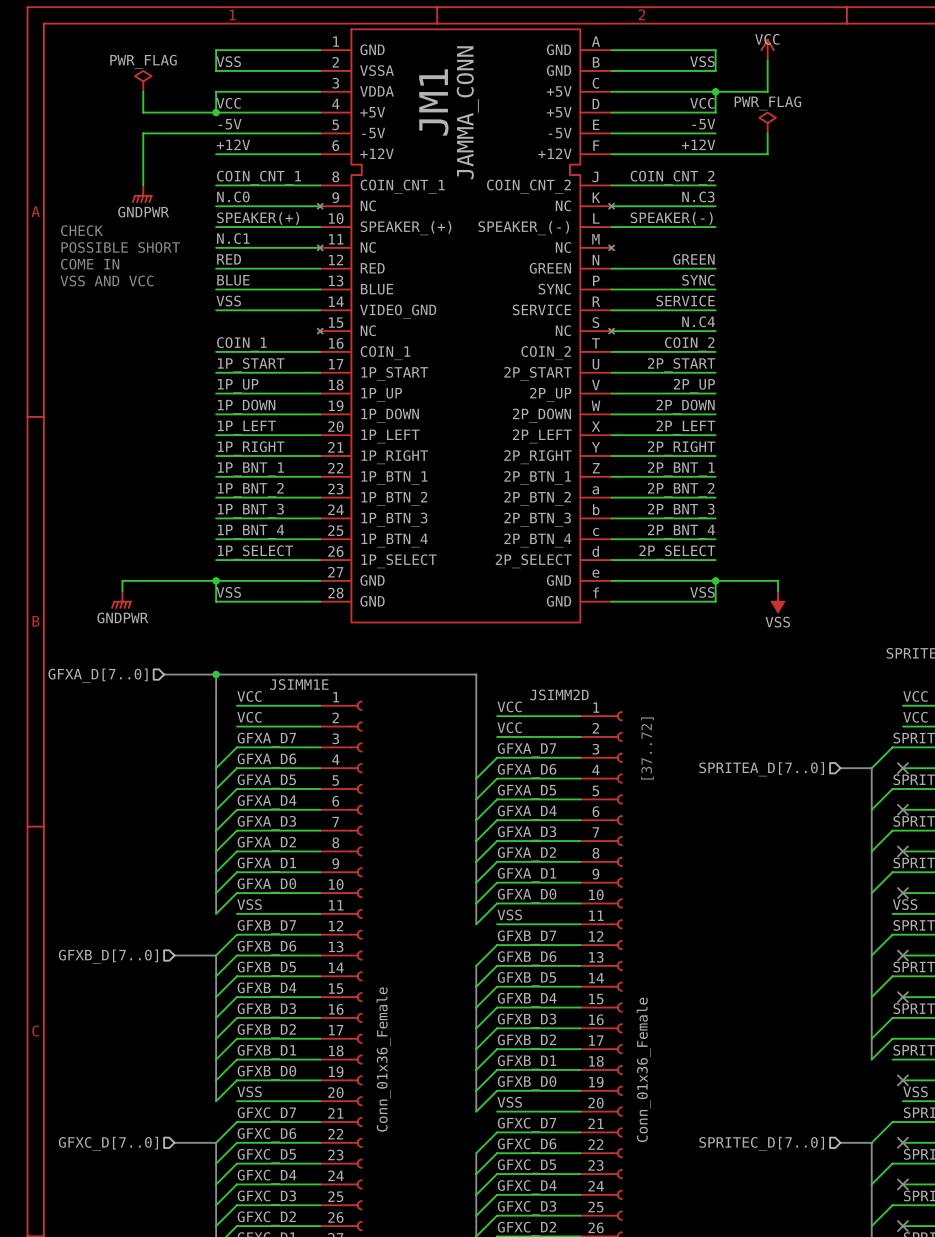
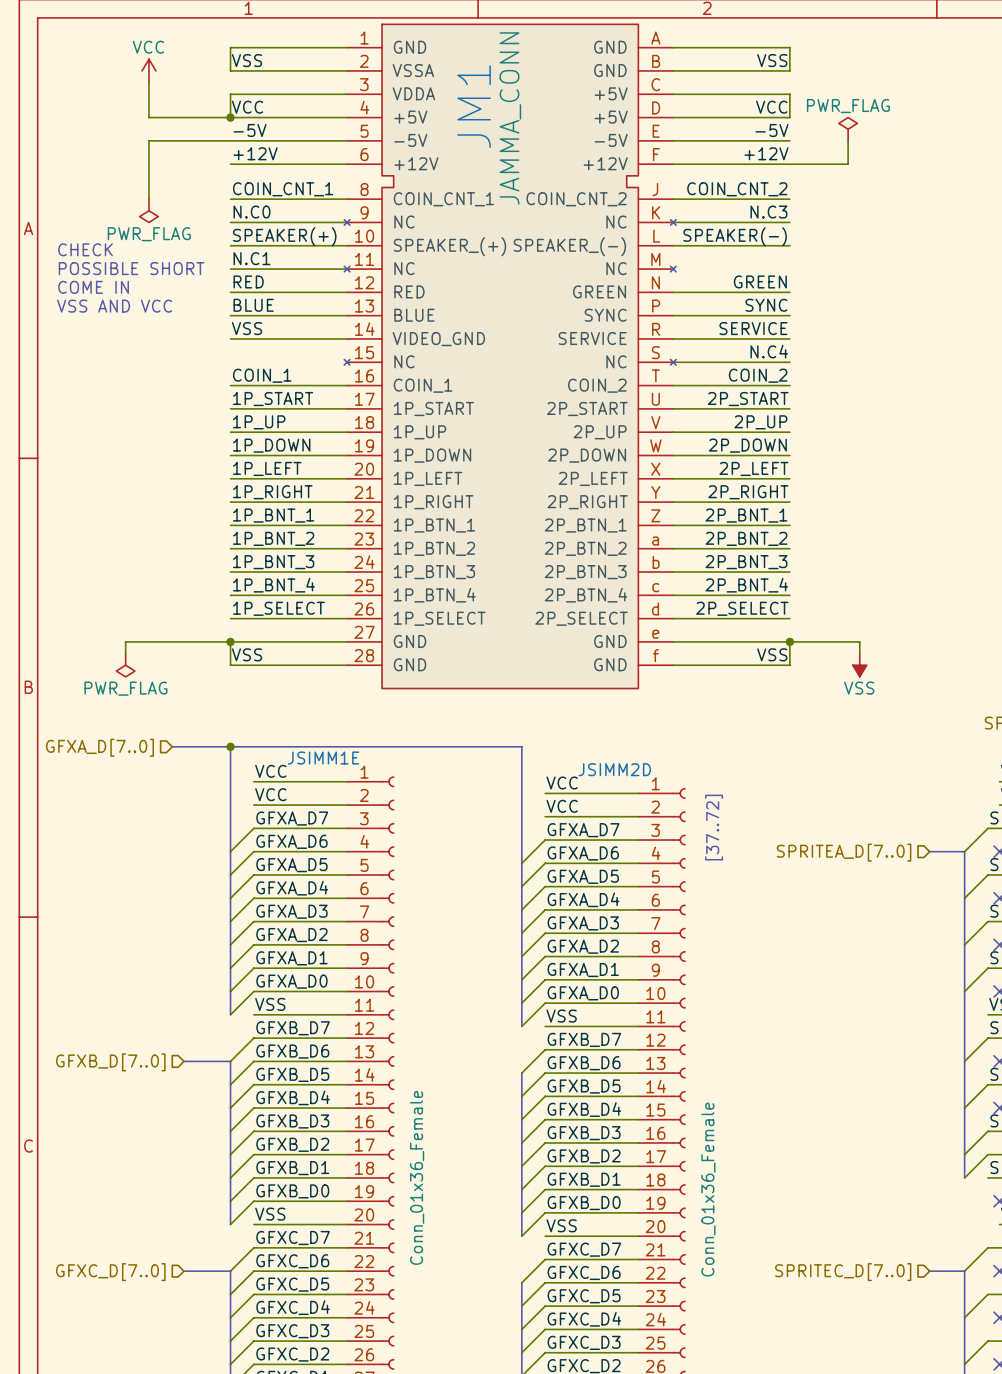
power symbol: VCC (767, 50) -> none
wire: (767, 60) (767, 91) (715, 91) -> none
power symbol: none -> VCC (148, 70)
power symbol: PWR_FLAG (143, 81) -> none
junction: (715, 91) -> none
power symbol: GNDPWR (142, 194) -> PWR_FLAG (148, 210)
power symbol: GNDPWR (121, 600) -> PWR_FLAG (125, 665)

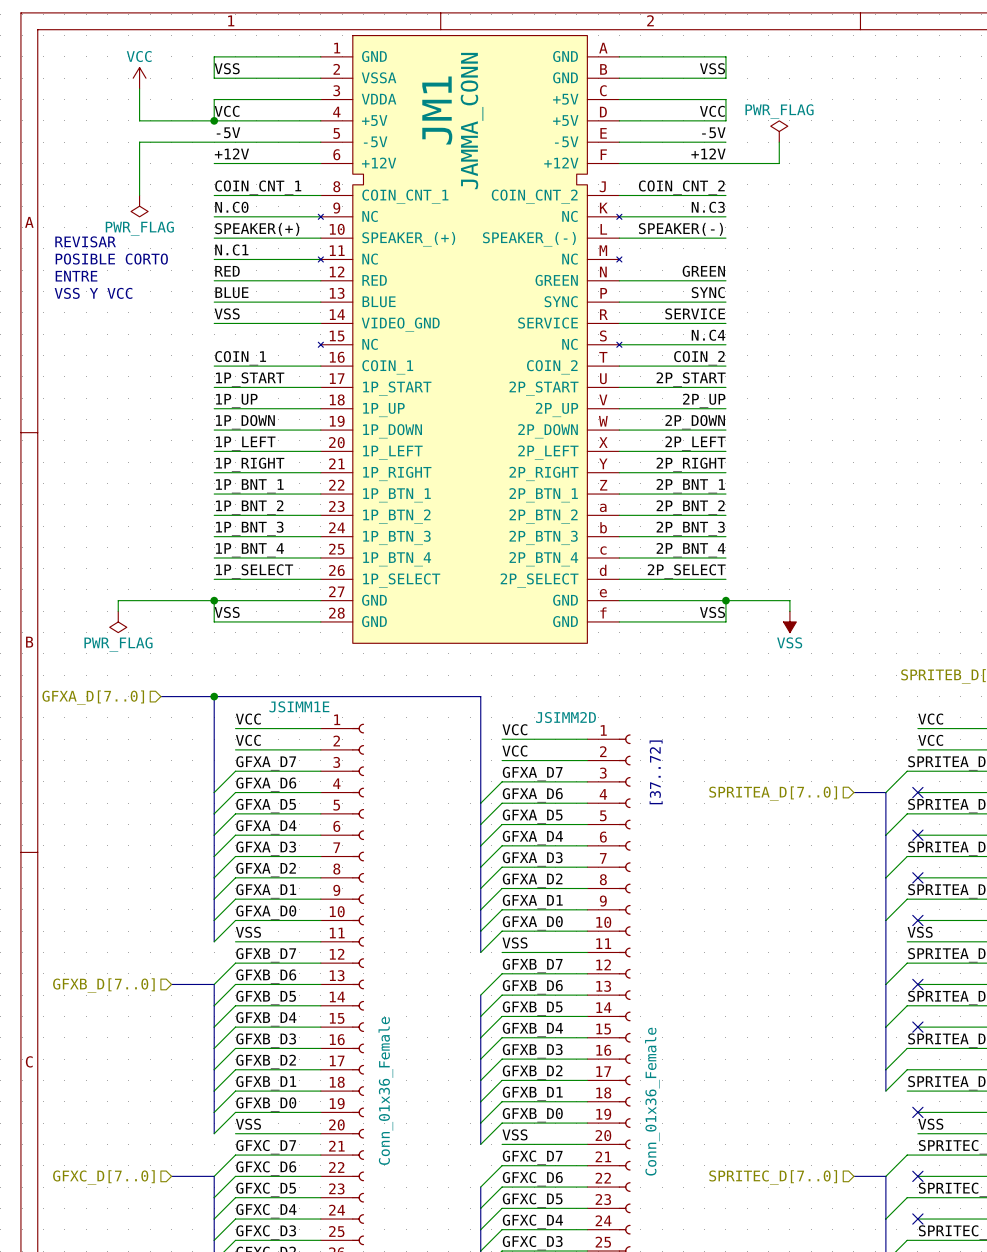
text: CHECK (85, 249) -> REVISAR (85, 241)
text: POSSIBLE SHORT (131, 268) -> POSIBLE CORTO (111, 259)
text: COME IN (93, 287) -> ENTRE (76, 276)
text: VSS AND VCC (114, 306) -> VSS Y VCC (93, 293)

